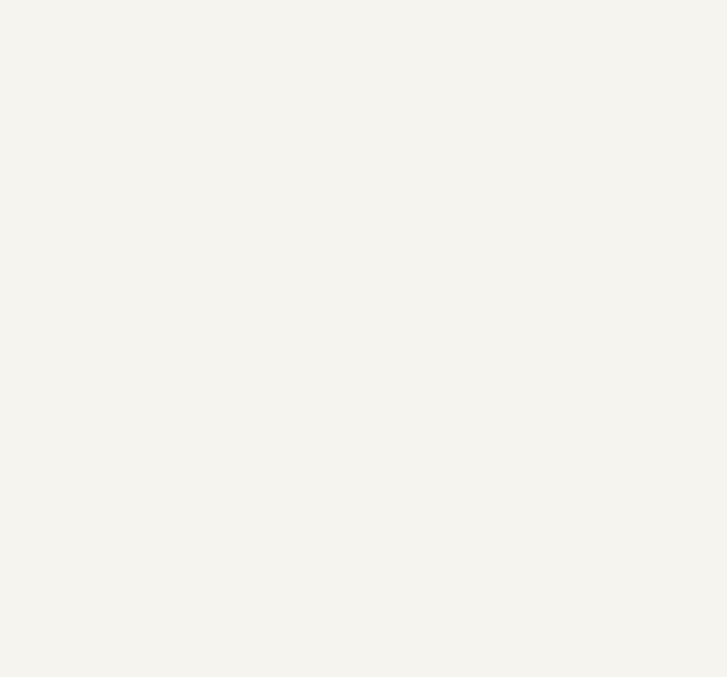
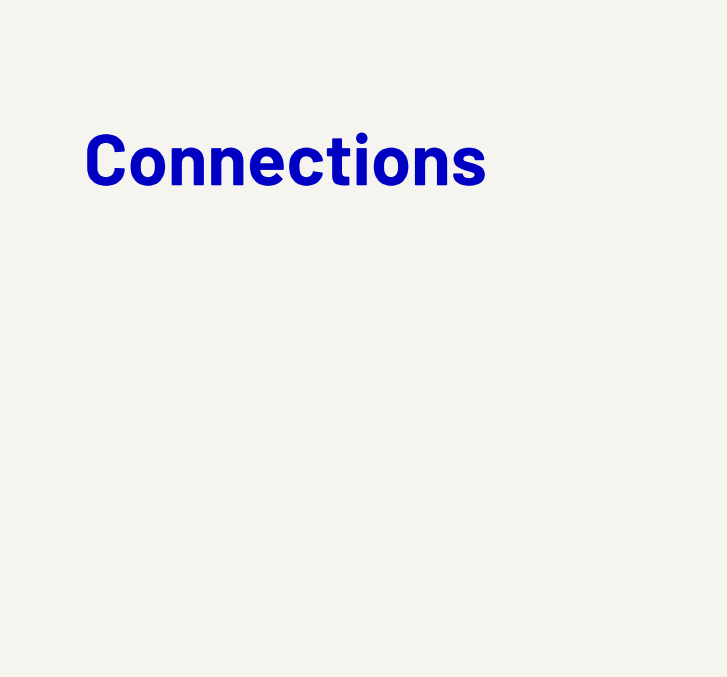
text: none -> Connections (286, 159)

